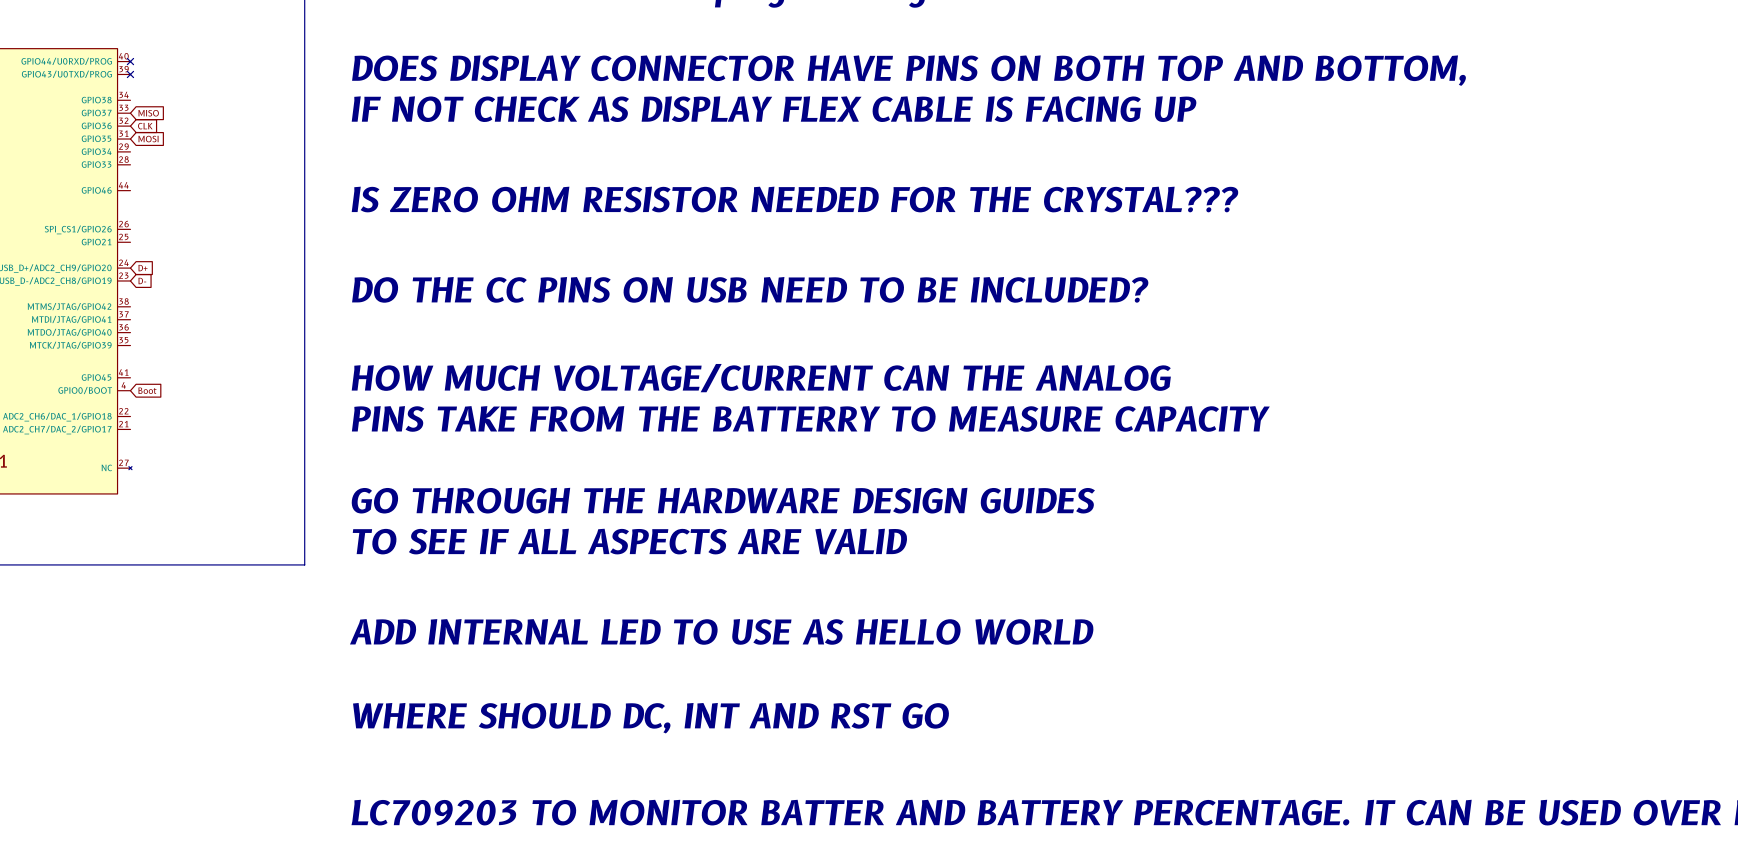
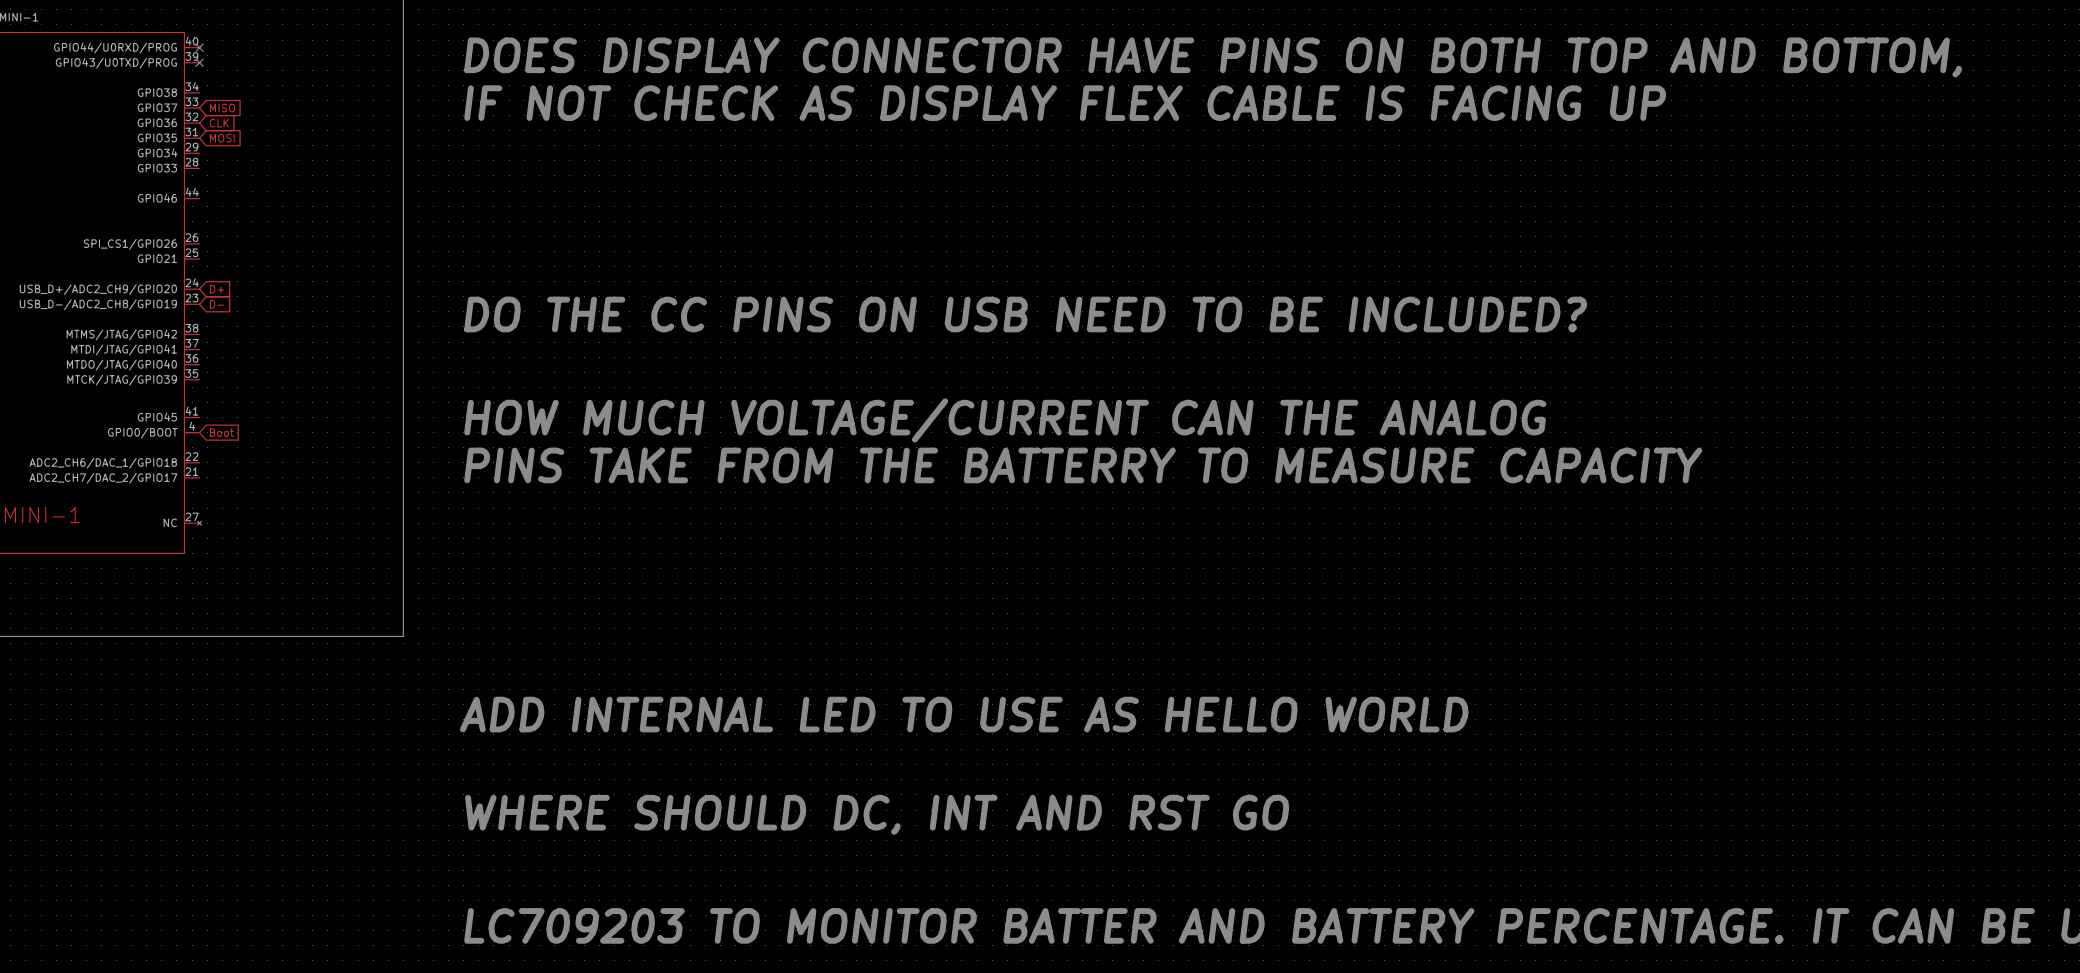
text: IS ZERO OHM RESISTOR NEEDED FOR THE CRYSTAL??? (795, 199) -> none
text: GO THROUGH THE HARDWARE DESIGN GUIDES (723, 500) -> none
text: TO SEE IF ALL ASPECTS ARE VALID (630, 541) -> none

